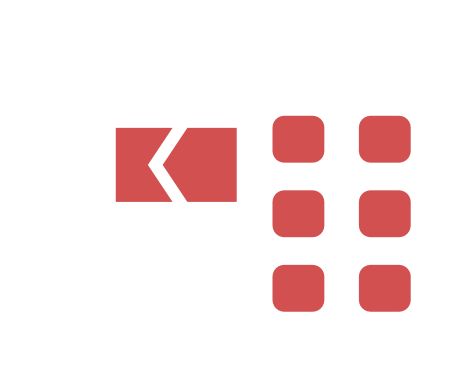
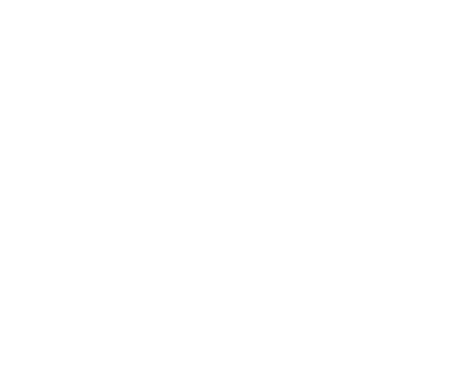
part: (341, 139) -> none
part: (176, 164) -> none
part: (341, 213) -> none
part: (341, 288) -> none

